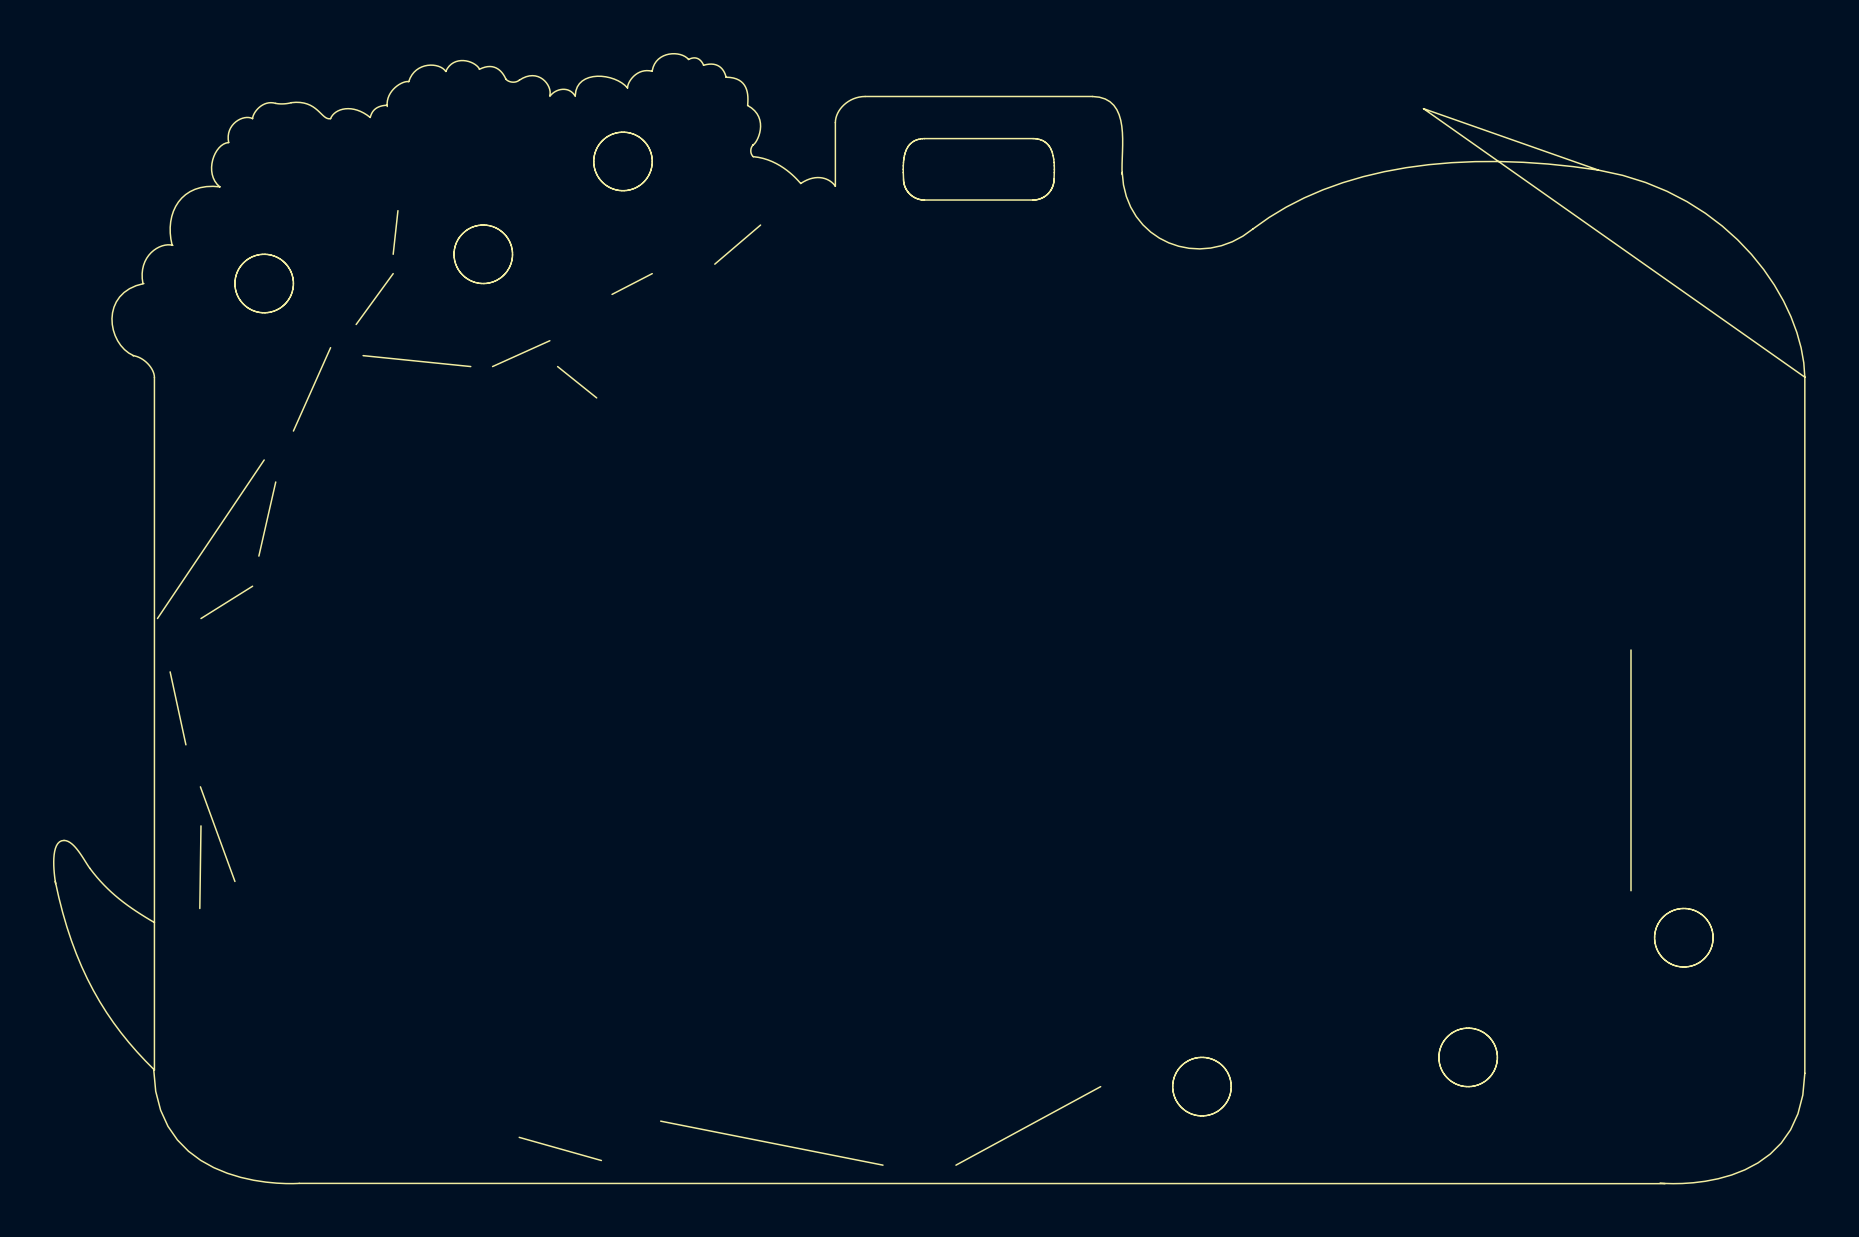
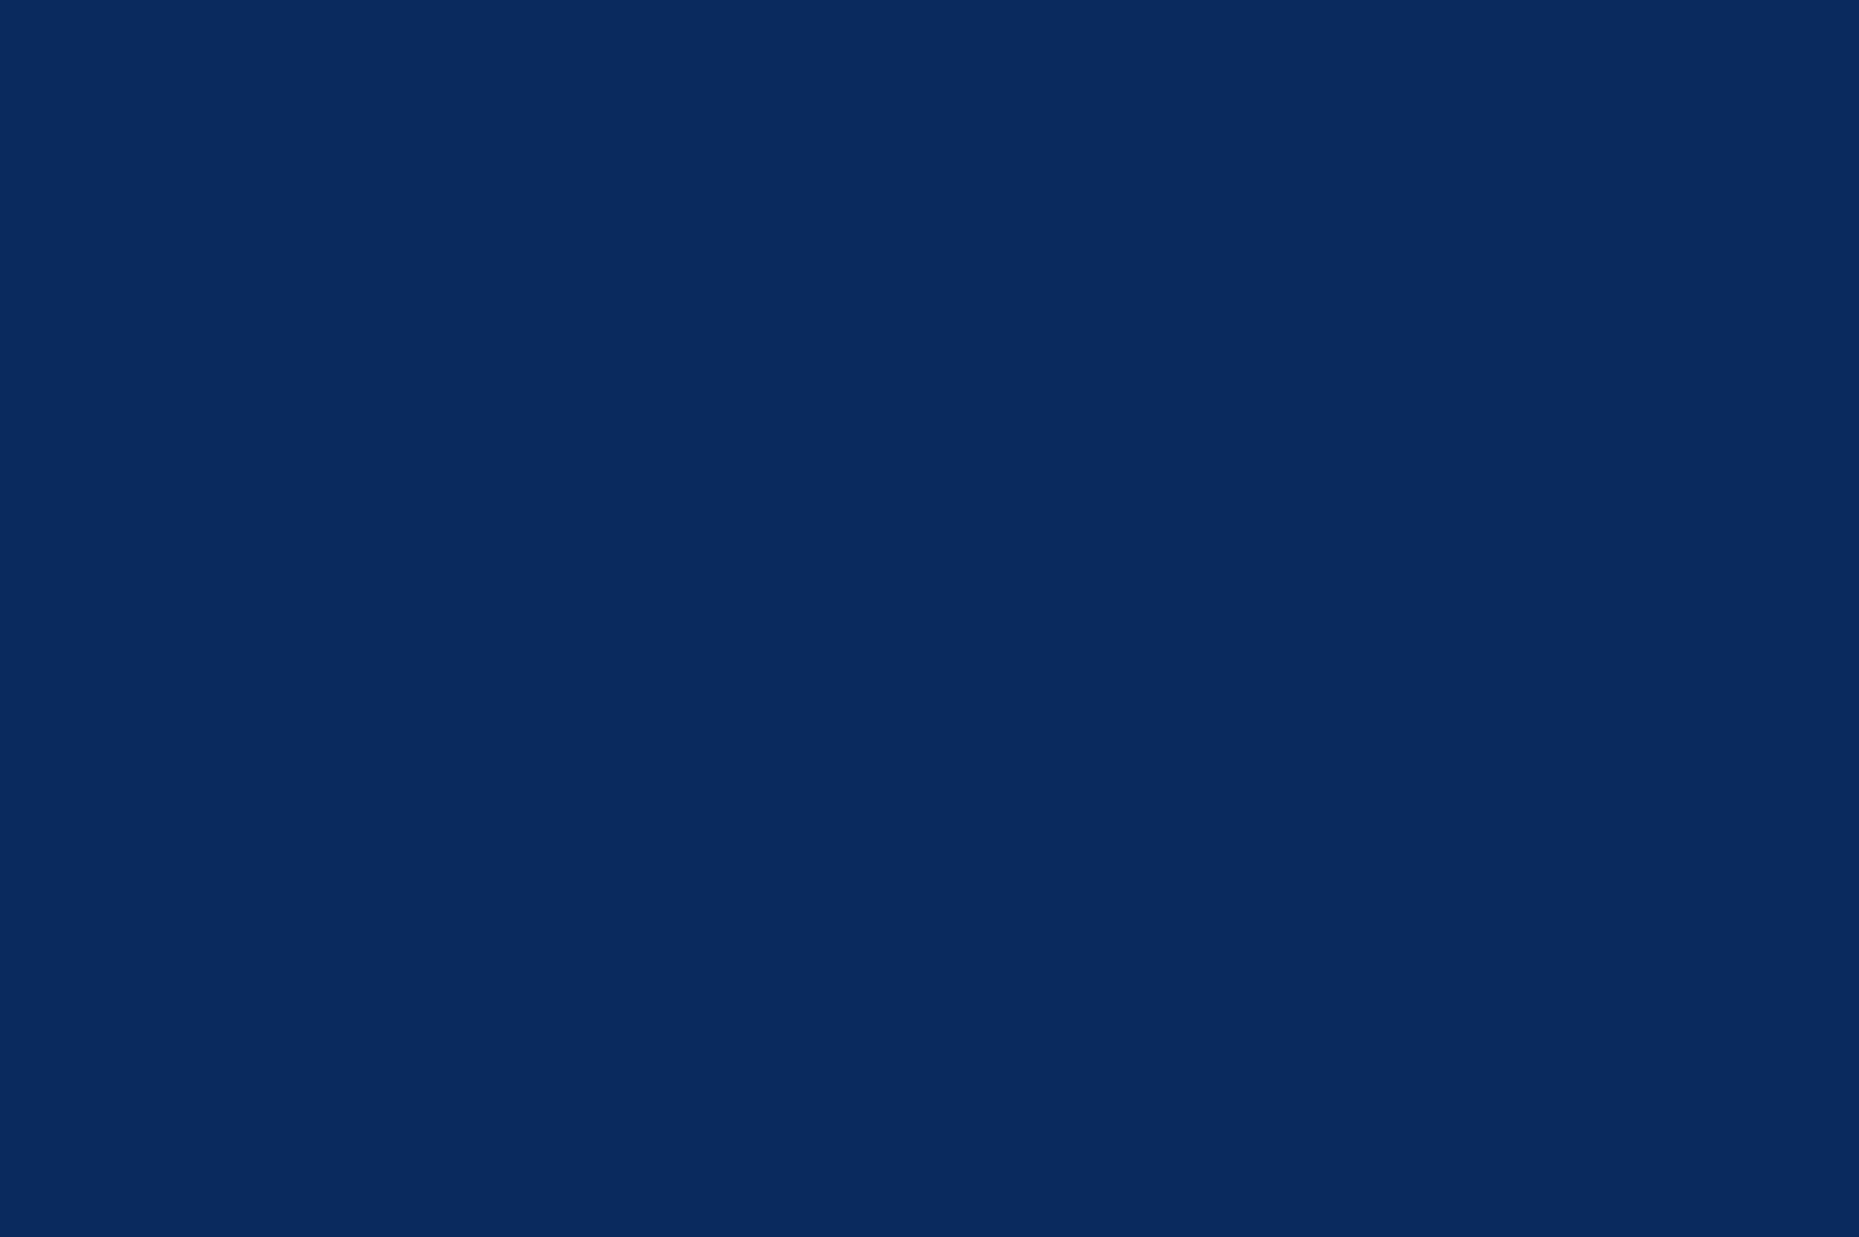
line: (703, 65) (696, 58) (688, 59) (682, 55) (671, 53) (658, 59) (652, 70) -> none
line: (703, 65) (717, 65) (722, 69) (726, 77) (736, 78) (744, 85) (747, 94) (747, 105) (757, 113) (760, 123) (758, 135) (752, 144) -> none
line: (479, 68) (470, 62) (461, 60) (451, 64) (445, 71) -> none
line: (479, 69) (487, 66) (496, 67) (506, 80) (511, 82) (529, 75) (538, 76) (547, 84) (549, 95) -> none
line: (445, 71) (435, 65) (424, 65) (414, 72) (408, 81) -> none
line: (652, 71) (644, 70) (635, 74) (630, 80) (627, 88) (610, 77) (589, 77) (579, 83) (575, 95) -> none
line: (408, 81) (400, 83) (393, 89) (388, 98) (387, 106) -> none
line: (549, 96) (557, 90) (564, 89) (571, 91) (575, 96) -> none
line: (386, 105) (375, 108) (370, 117) (360, 111) (348, 108) (338, 110) (328, 118) (312, 106) (304, 103) (264, 104) (256, 110) (252, 118) (242, 118) (233, 123) (228, 133) (228, 142) (221, 145) (215, 153) (211, 170) (214, 181) (219, 186) -> none
line: (621, 132) (610, 135) (601, 141) (595, 151) (593, 162) (596, 174) (603, 183) (612, 188) (624, 190) (635, 187) (644, 181) (650, 171) (652, 159) (649, 148) (642, 139) (633, 133) (621, 132) -> none
line: (924, 138) (910, 143) (905, 151) (903, 160) (904, 186) (909, 193) (917, 198) (1035, 199) (1045, 195) (1052, 186) (1054, 169) (1052, 152) (1048, 144) (1040, 139) (924, 138) -> none
line: (753, 144) (750, 151) (753, 156) (776, 163) (800, 183) (809, 179) (820, 177) (828, 180) (835, 186) (835, 117) (844, 104) (856, 97) (1092, 96) (1110, 101) (1119, 114) (1122, 132) (1122, 174) -> none
line: (1598, 170) (1423, 108) (1804, 377) -> none
line: (1598, 170) (1523, 162) (1475, 161) (1428, 164) (1384, 171) (1323, 189) (1286, 207) (1232, 241) (1221, 245) (1199, 248) (1168, 242) (1143, 224) (1130, 207) (1126, 196) (1122, 172) -> none
line: (1598, 170) (1622, 175) (1667, 191) (1705, 213) (1737, 239) (1763, 269) (1783, 300) (1796, 332) (1801, 347) (1804, 377) -> none
line: (220, 186) (206, 186) (194, 189) (185, 194) (178, 202) (170, 221) (172, 244) -> none
line: (397, 210) (393, 254) -> none
line: (483, 225) (471, 227) (462, 233) (456, 242) (454, 254) (456, 265) (462, 274) (471, 281) (483, 283) (494, 281) (503, 274) (510, 265) (512, 254) (510, 242) (503, 233) (494, 227) (483, 225) -> none
line: (760, 225) (714, 264) -> none
line: (172, 245) (159, 246) (148, 255) (142, 269) (142, 283) -> none
line: (261, 254) (250, 257) (241, 264) (236, 274) (235, 286) (238, 297) (245, 306) (255, 311) (267, 312) (278, 309) (286, 302) (292, 292) (293, 280) (289, 269) (282, 260) (272, 255) (261, 254) -> none
line: (393, 273) (356, 324) -> none
line: (652, 273) (612, 294) -> none
line: (143, 283) (124, 292) (116, 301) (112, 312) (112, 324) (117, 340) (124, 349) (133, 355) -> none
line: (549, 340) (492, 366) -> none
line: (330, 347) (293, 431) -> none
line: (132, 355) (147, 363) (154, 377) (154, 1069) -> none
line: (363, 355) (470, 366) -> none
line: (557, 366) (596, 397) -> none
line: (1804, 377) (1804, 1073) (1802, 1095) (1797, 1113) (1790, 1129) (1781, 1143) (1758, 1162) (1745, 1169) (1718, 1178) (1693, 1182) (1660, 1183) -> none
line: (264, 459) (157, 618) -> none
line: (275, 481) (258, 556) -> none
line: (252, 586) (200, 618) -> none
line: (1631, 650) (1631, 890) -> none
line: (170, 671) (185, 744) -> none
line: (200, 786) (234, 881) -> none
line: (200, 825) (199, 908) -> none
line: (55, 881) (71, 940) (93, 990) (121, 1032) (154, 1069) -> none
line: (55, 883) (54, 851) (59, 841) (65, 840) (75, 847) (93, 872) (111, 892) (154, 922) -> none
line: (1683, 908) (1672, 910) (1663, 917) (1656, 926) (1654, 937) (1656, 949) (1663, 958) (1672, 964) (1683, 966) (1695, 964) (1704, 958) (1710, 949) (1713, 937) (1710, 926) (1704, 917) (1695, 910) (1683, 908) -> none
line: (1466, 1028) (1455, 1031) (1446, 1037) (1440, 1047) (1438, 1058) (1441, 1070) (1448, 1079) (1458, 1084) (1469, 1086) (1480, 1083) (1489, 1077) (1495, 1067) (1497, 1055) (1494, 1044) (1487, 1035) (1478, 1029) (1466, 1028) -> none
line: (1201, 1057) (1190, 1059) (1181, 1065) (1175, 1075) (1172, 1086) (1175, 1098) (1181, 1107) (1190, 1113) (1201, 1115) (1213, 1113) (1222, 1107) (1228, 1098) (1231, 1086) (1228, 1075) (1222, 1065) (1213, 1059) (1201, 1057) -> none
line: (154, 1069) (155, 1091) (160, 1110) (167, 1126) (188, 1151) (200, 1160) (227, 1173) (253, 1180) (276, 1183) (1665, 1183) -> none
line: (1100, 1086) (955, 1165) -> none
line: (660, 1121) (882, 1165) -> none
line: (519, 1137) (601, 1160) -> none

